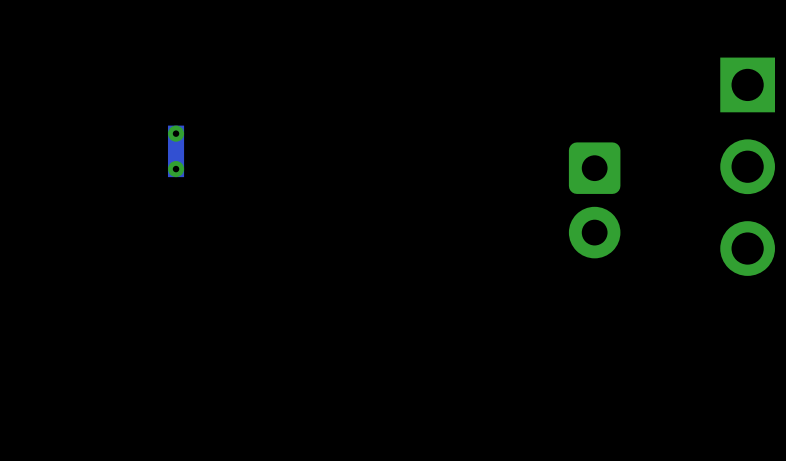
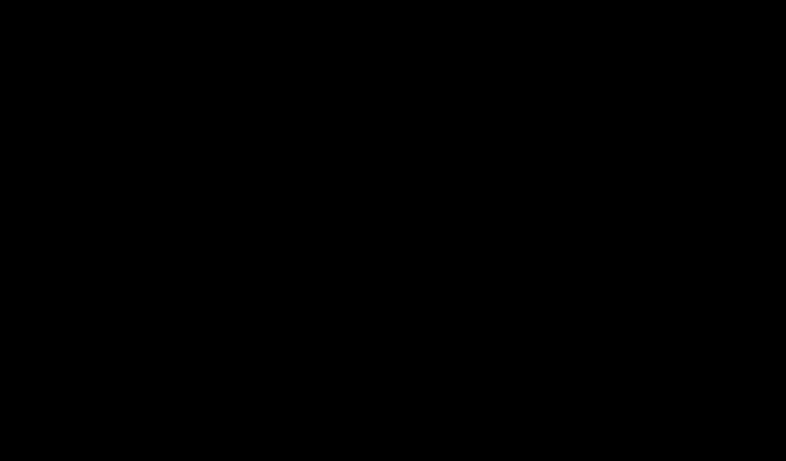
part: (176, 151) -> none
part: (747, 166) -> none
part: (594, 200) -> none

